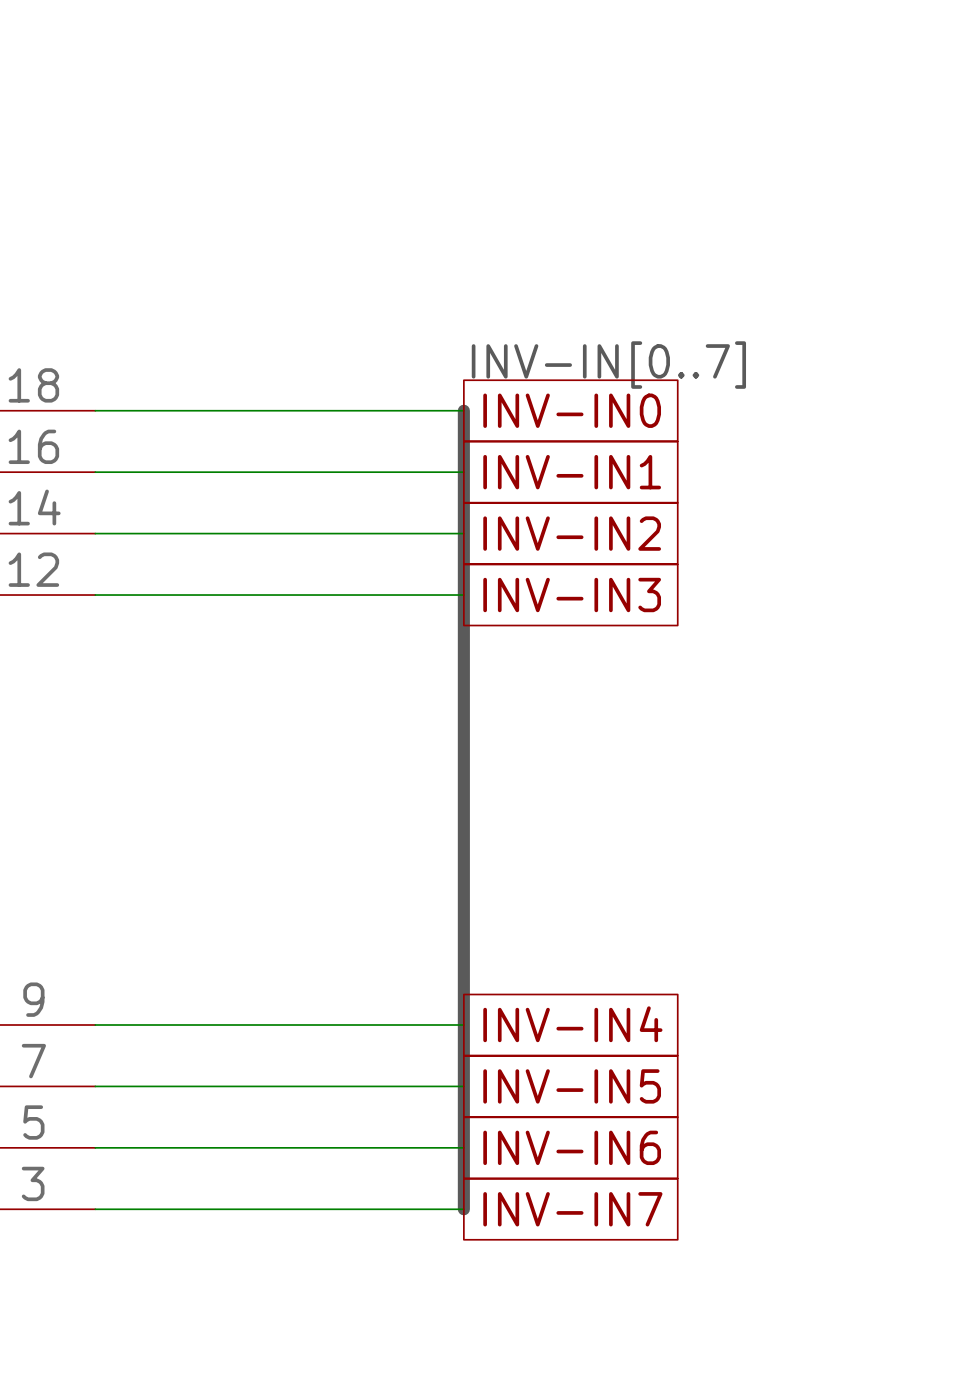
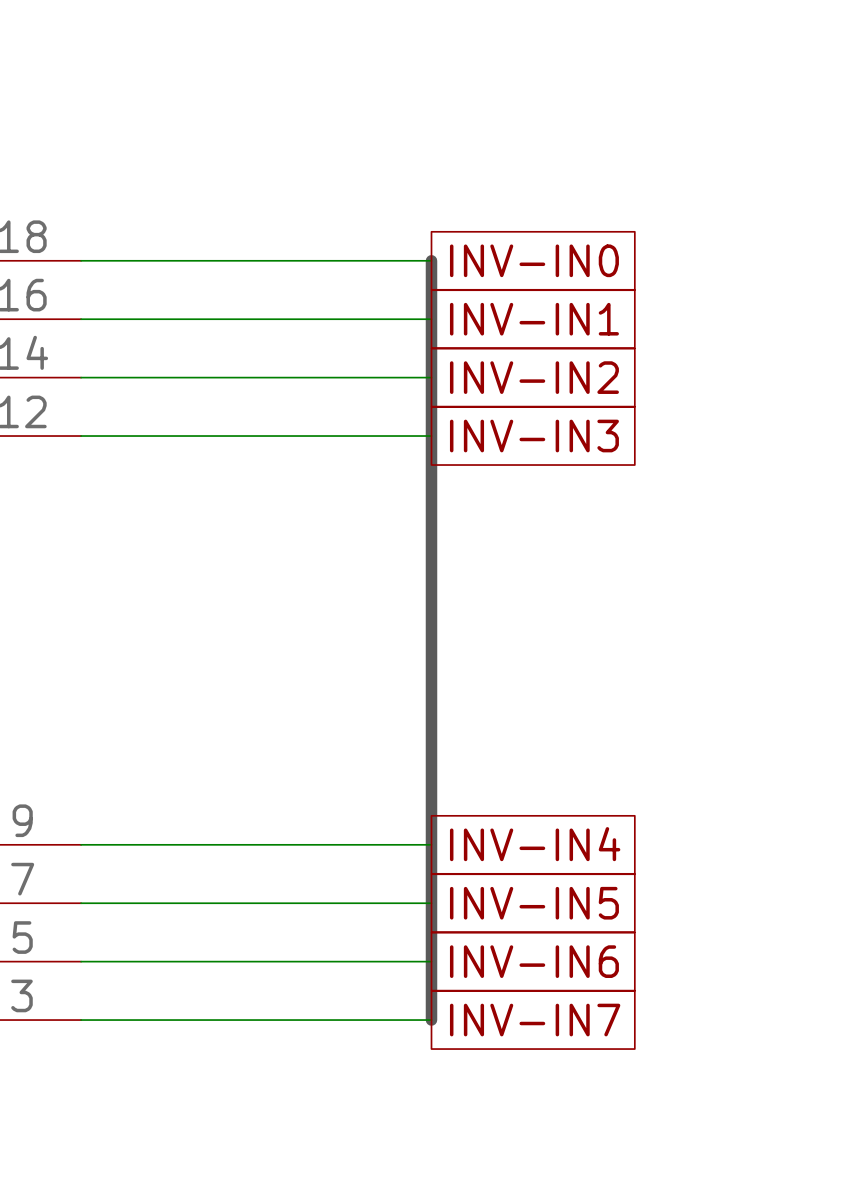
text: INV-IN[0..7] (608, 365) -> none

